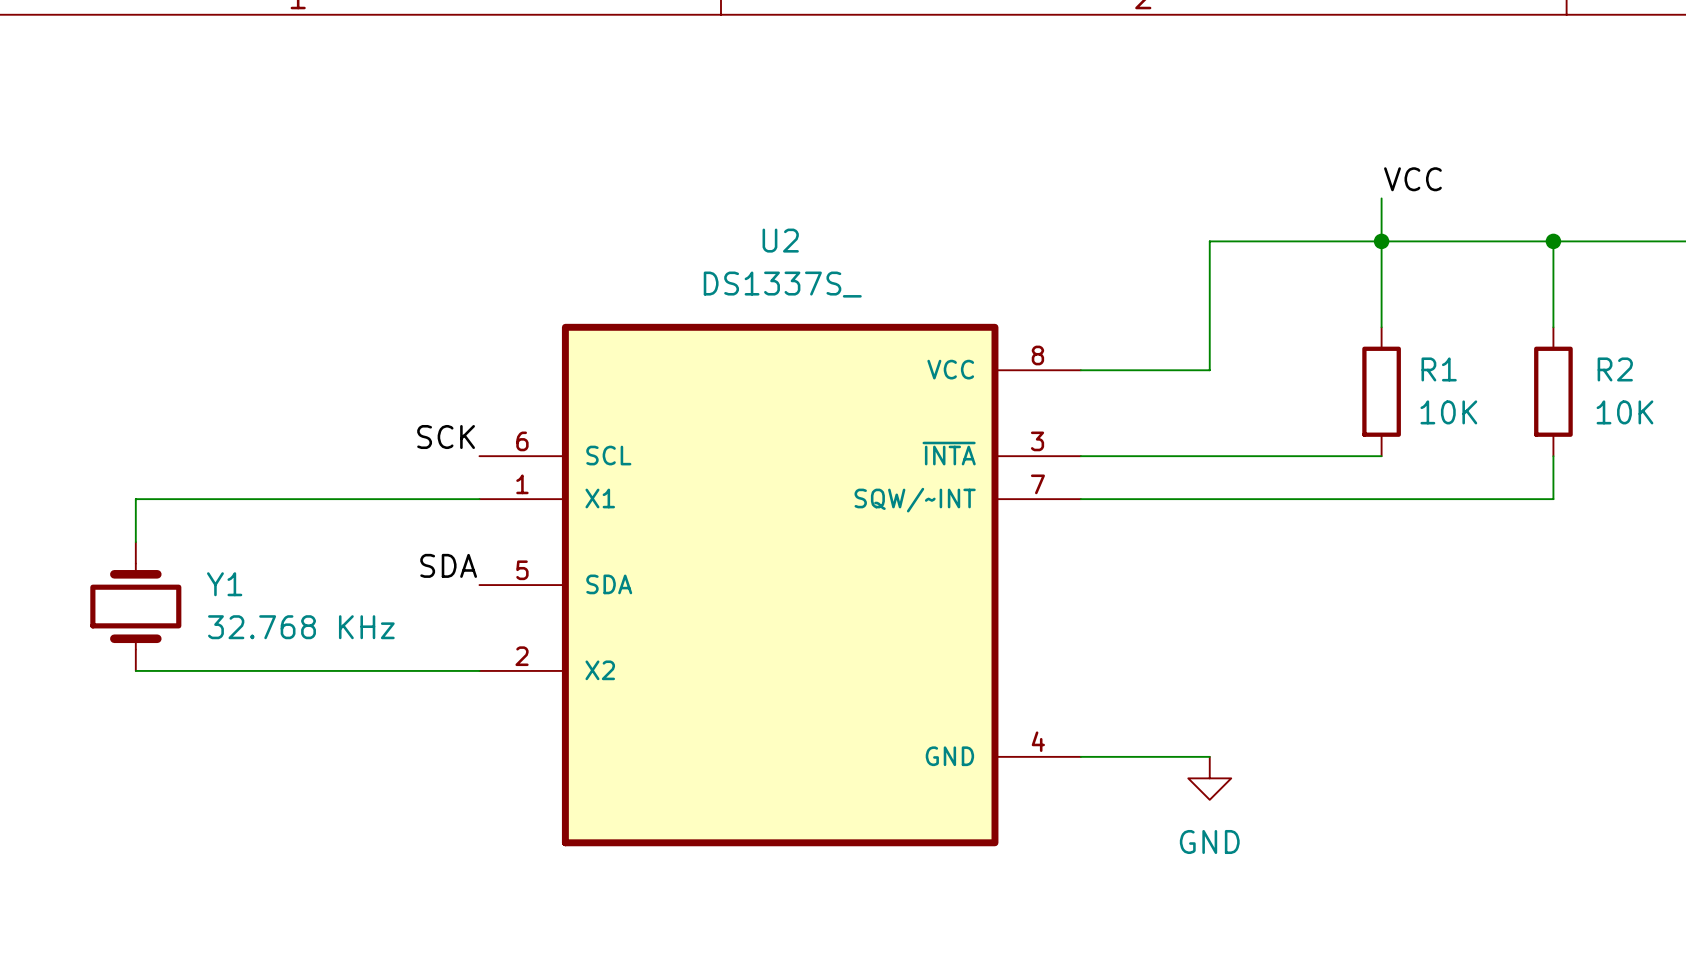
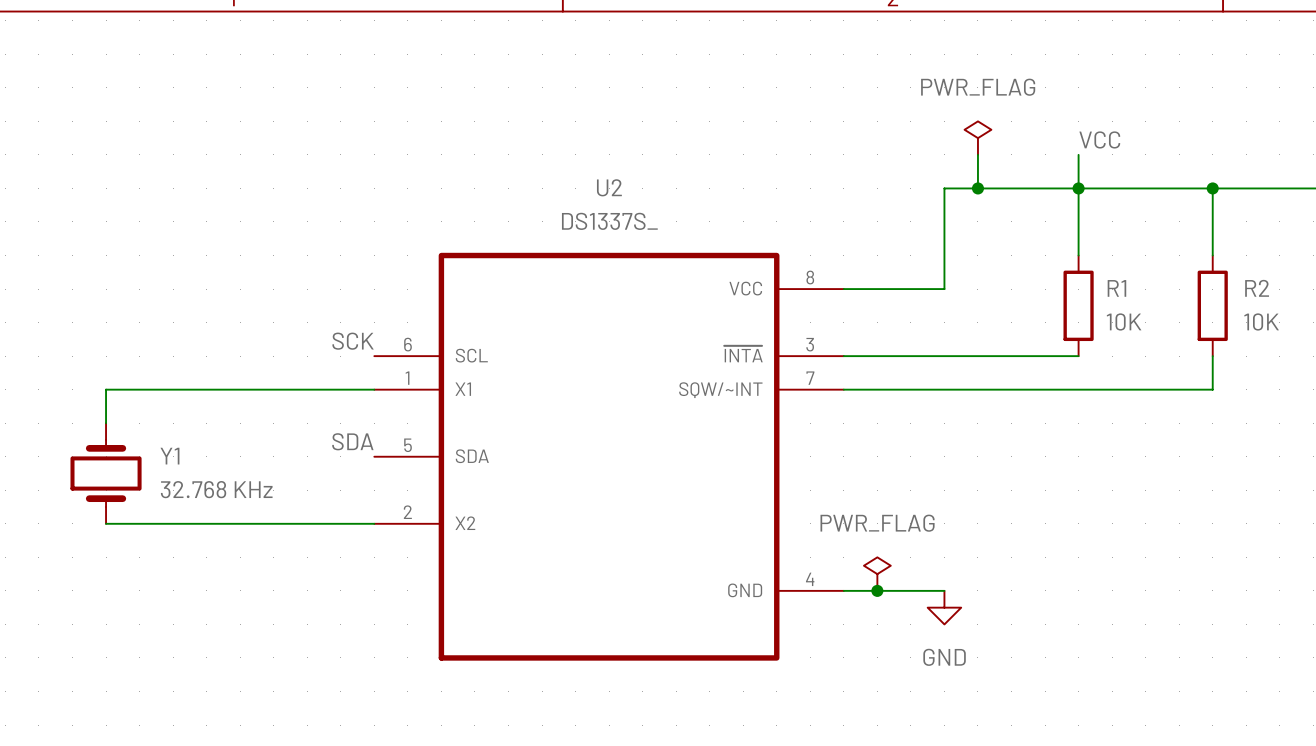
power symbol: none -> PWR_FLAG (977, 138)
wire: none -> (977, 154) (977, 188)
junction: none -> (977, 188)
power symbol: none -> PWR_FLAG (877, 574)
junction: none -> (877, 590)

